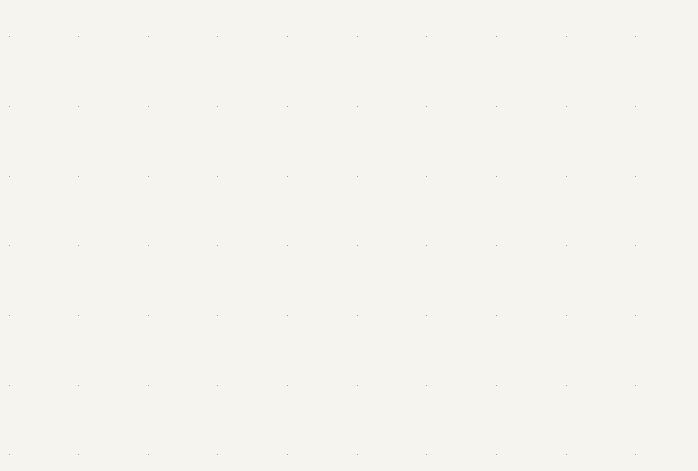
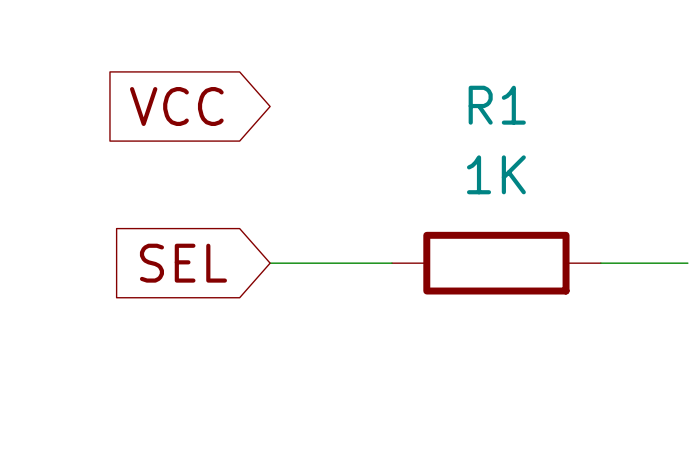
global label: none -> VCC (176, 106)
global label: none -> SEL (183, 263)
wire: none -> (270, 263) (391, 263)
R1: none -> 1K (496, 263)
wire: none -> (600, 263) (687, 263)

